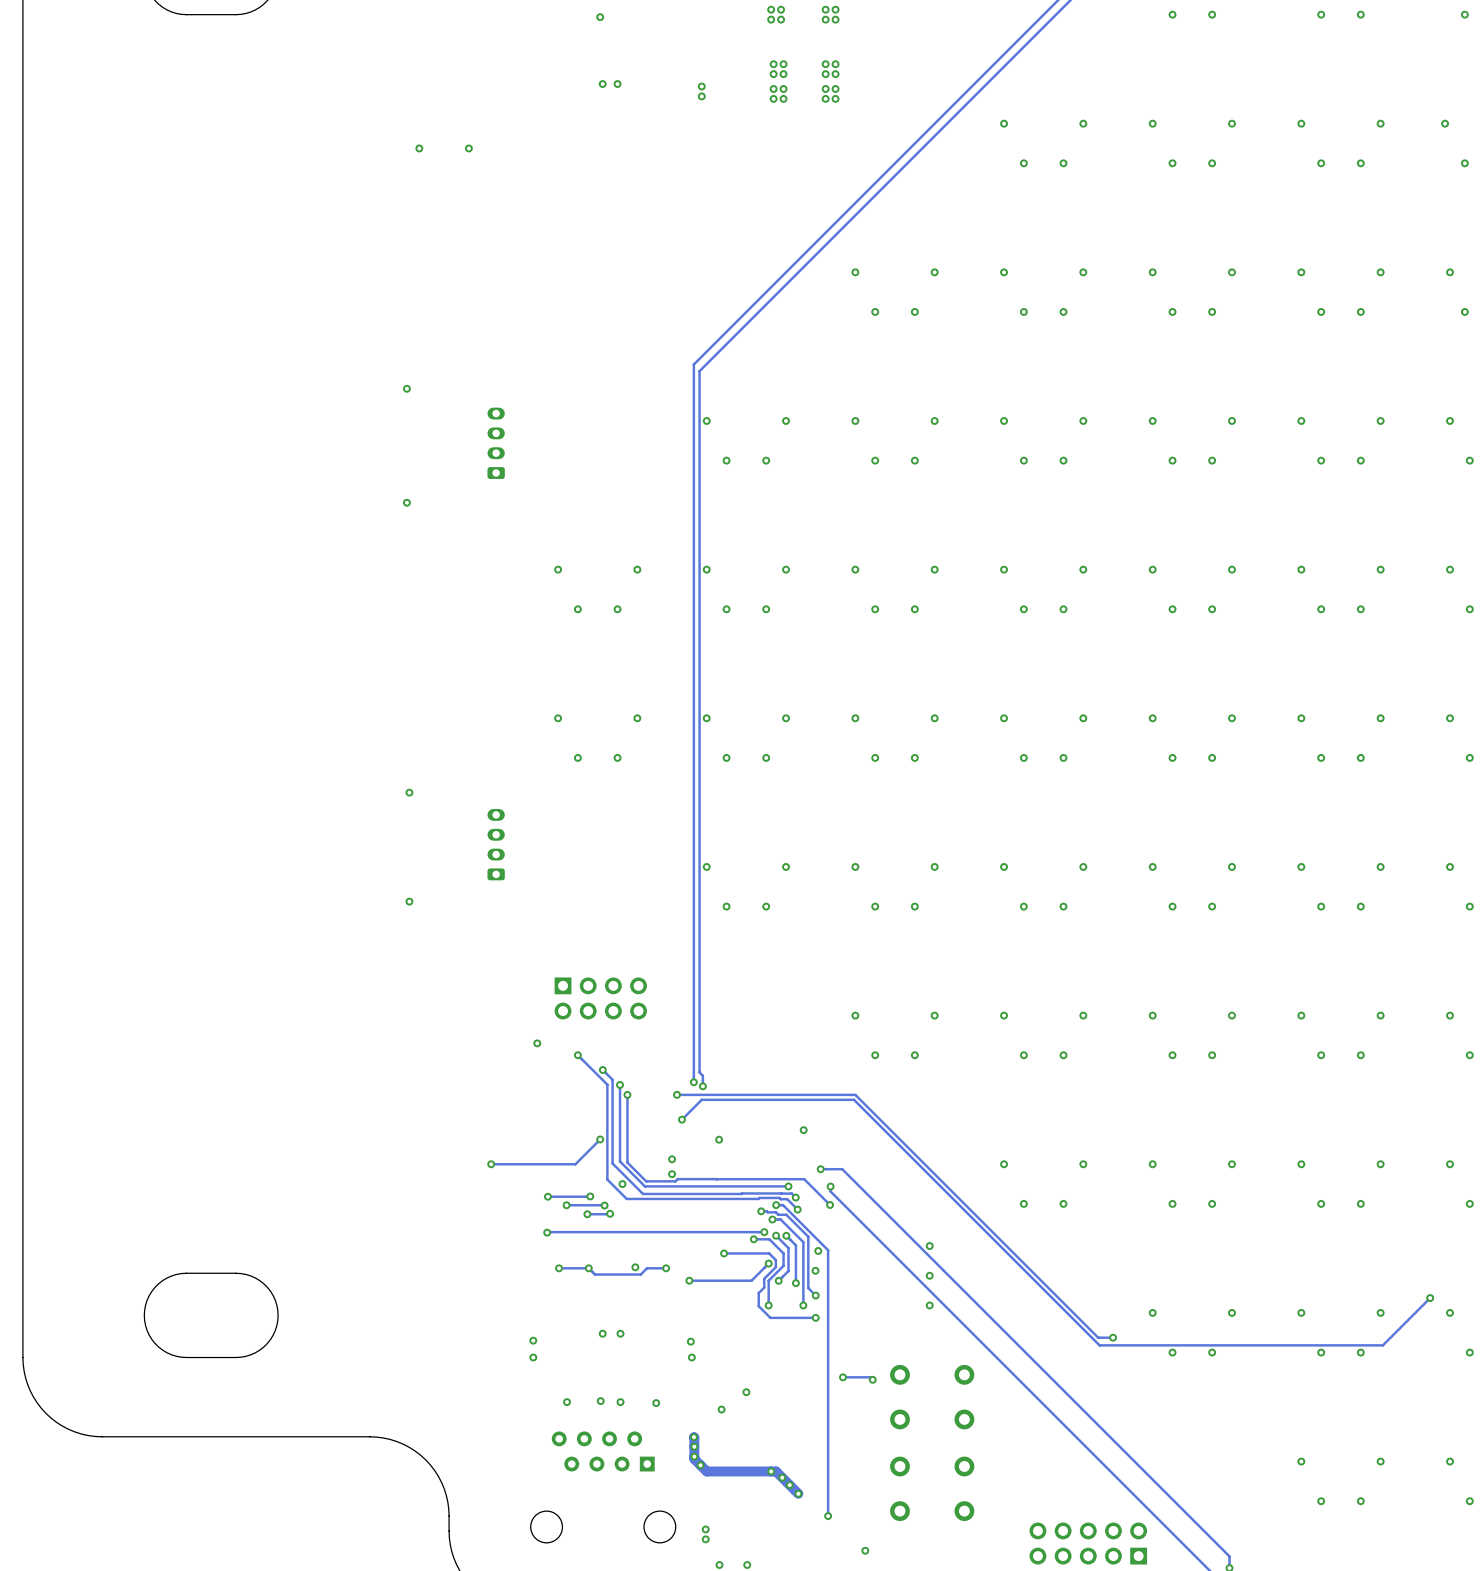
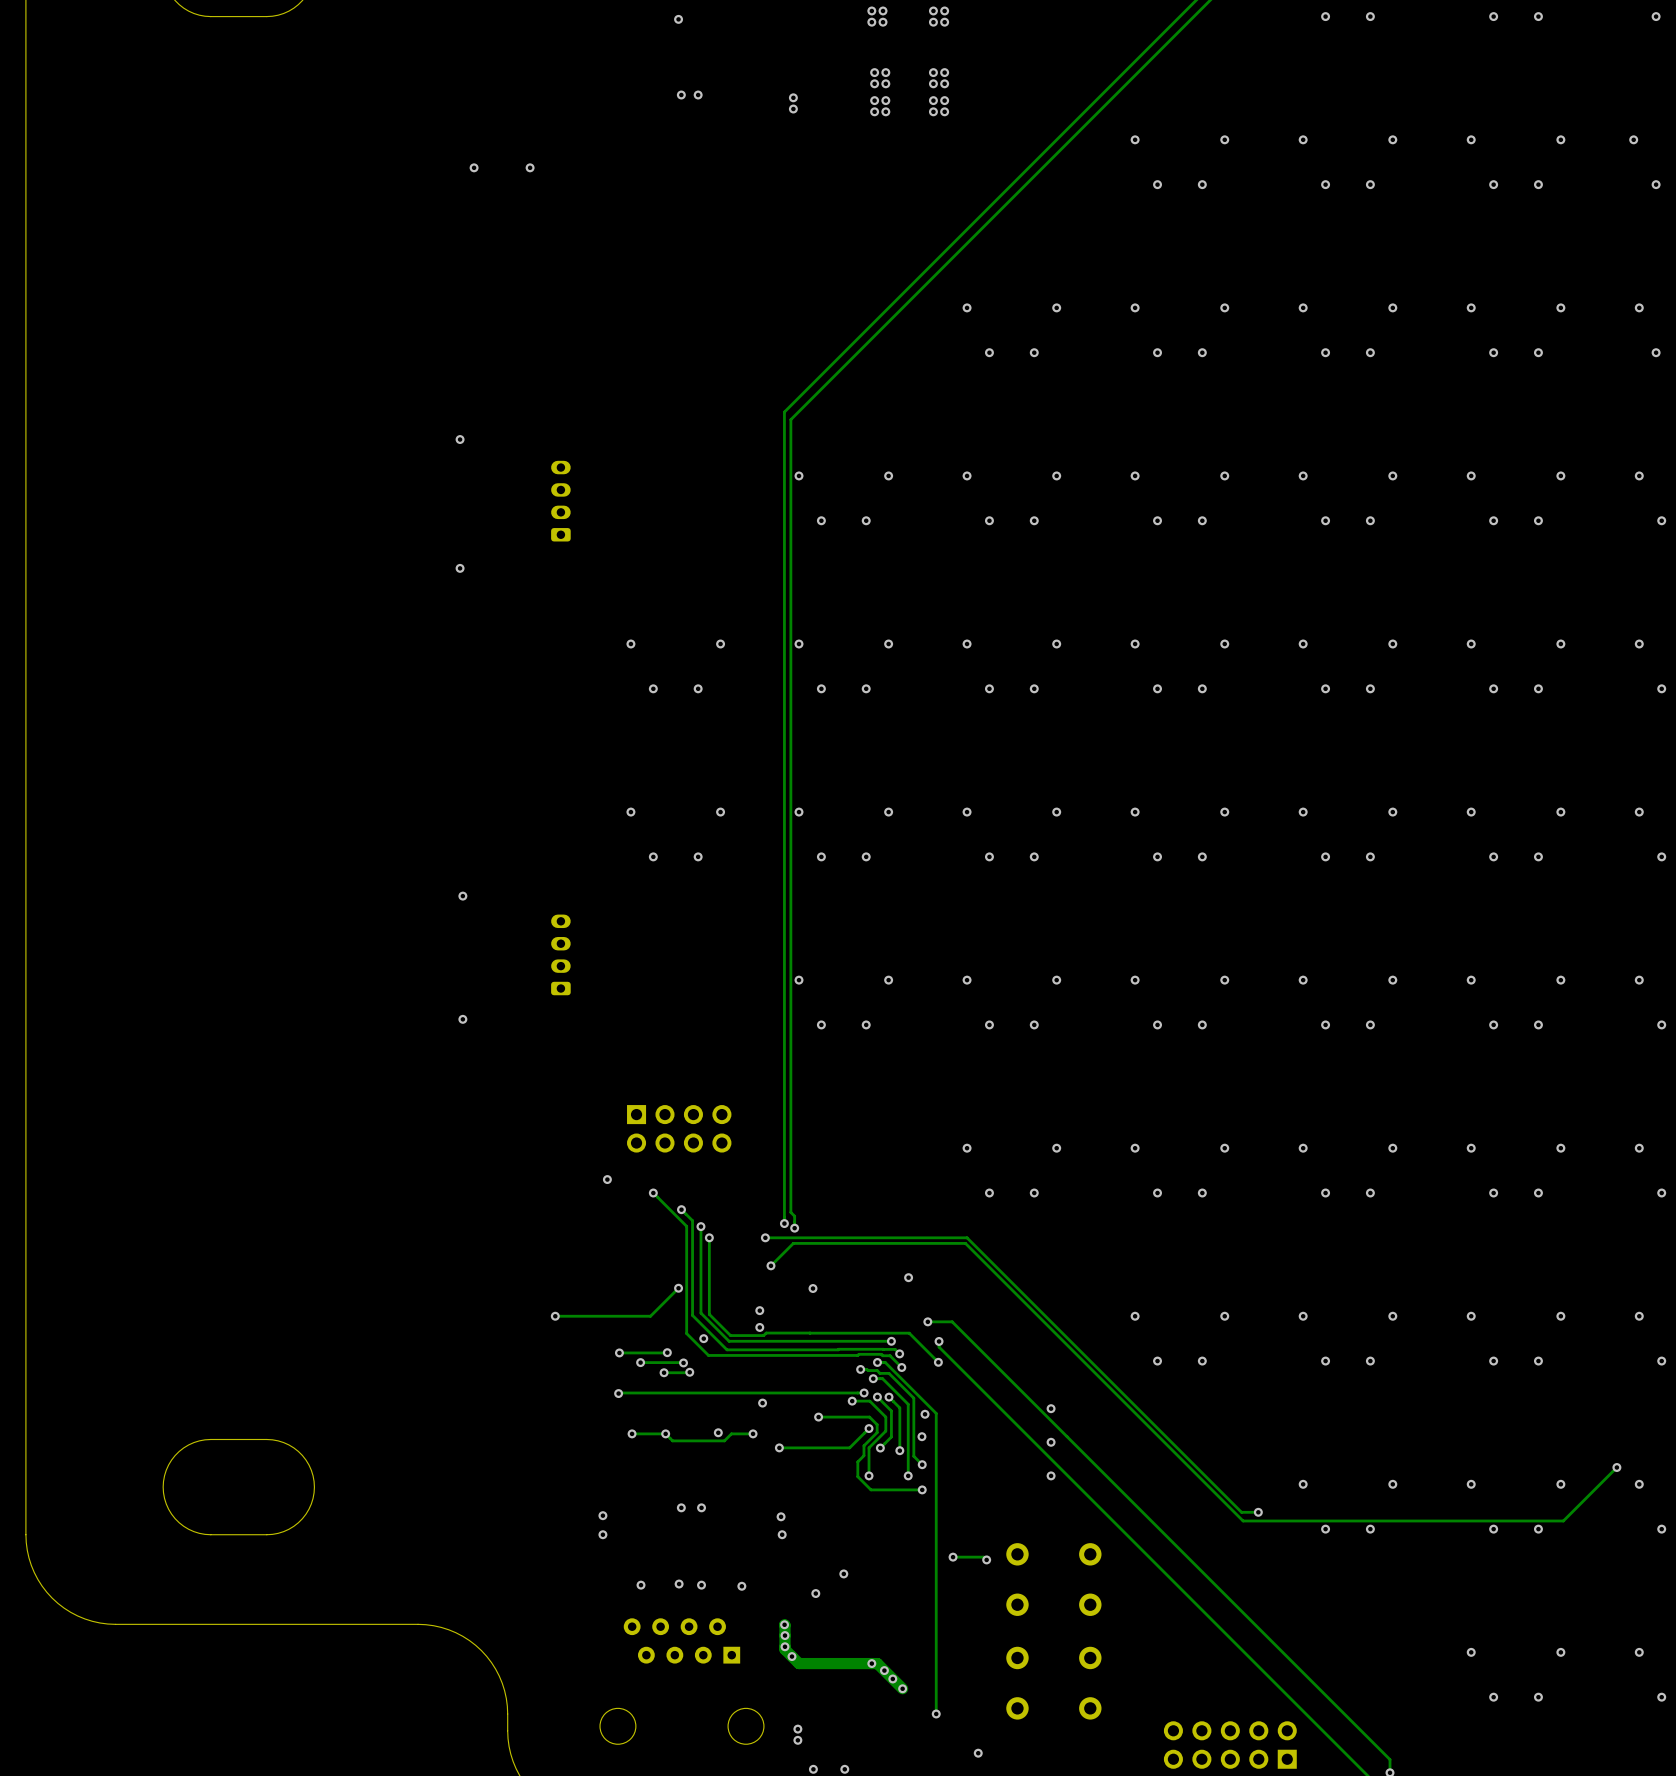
via: none -> (762, 1403)

